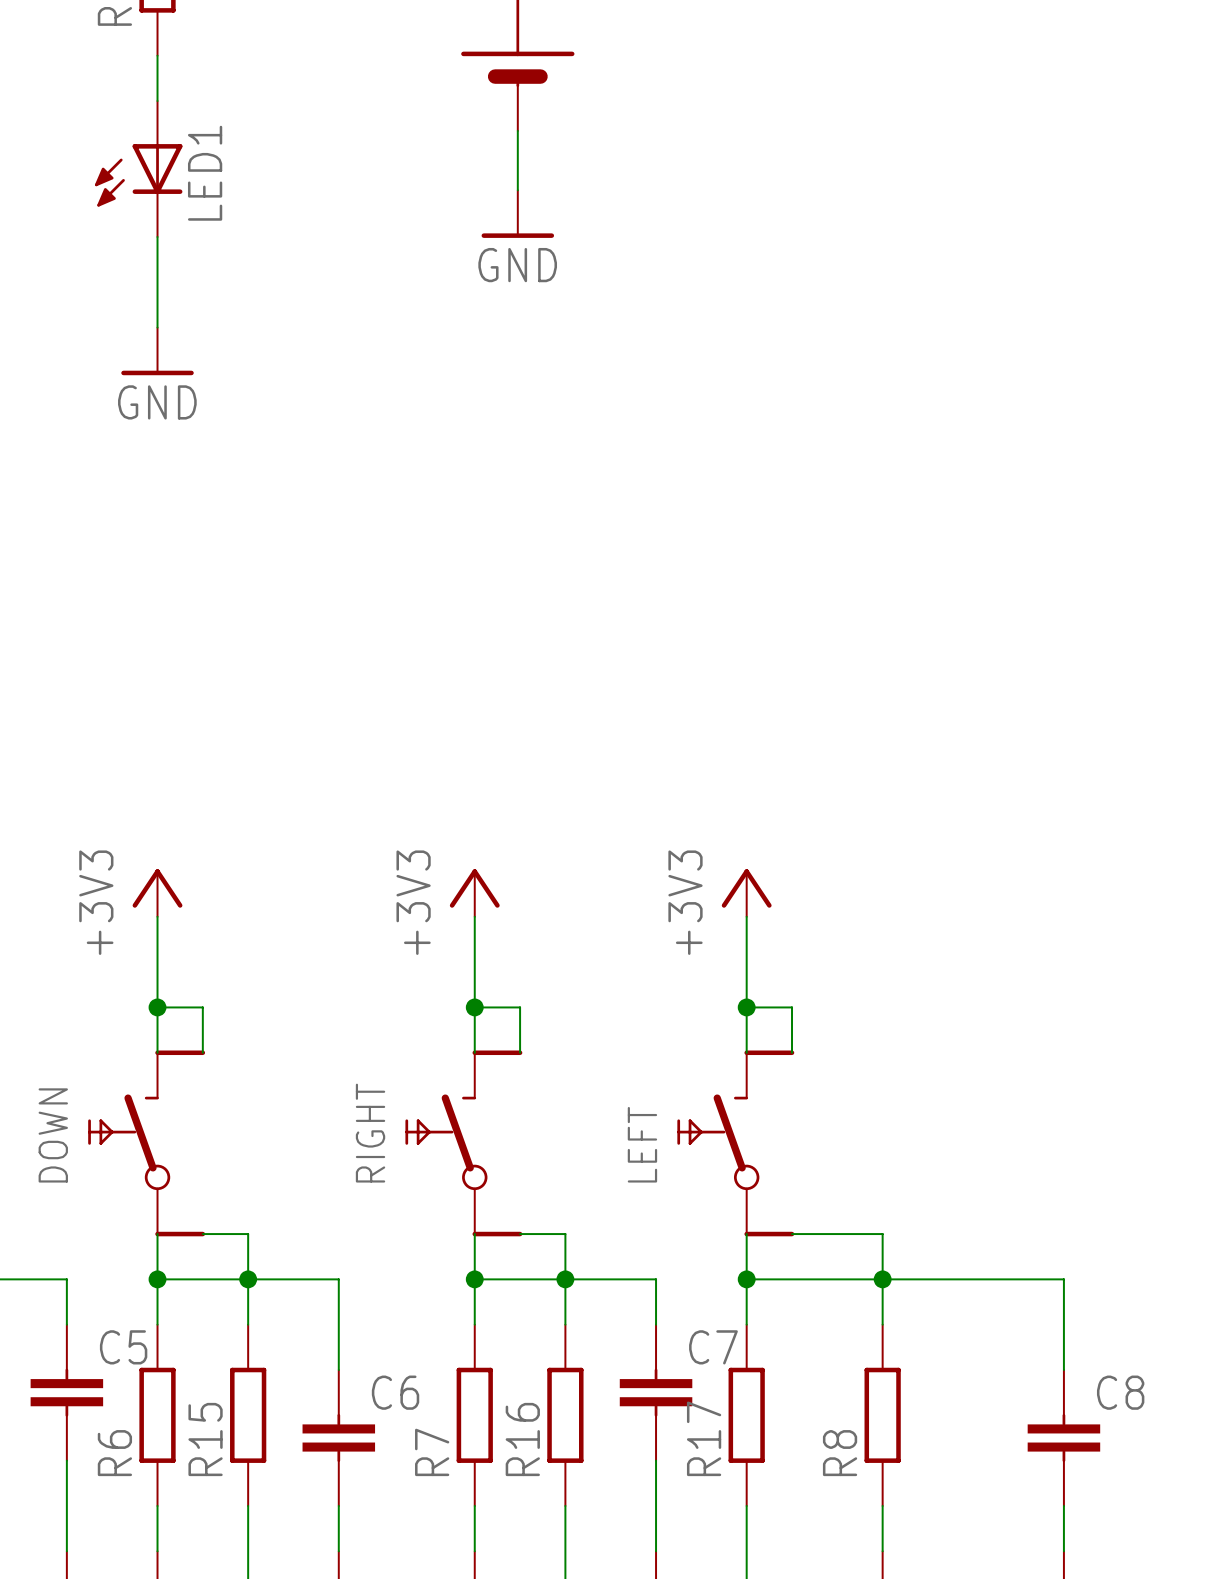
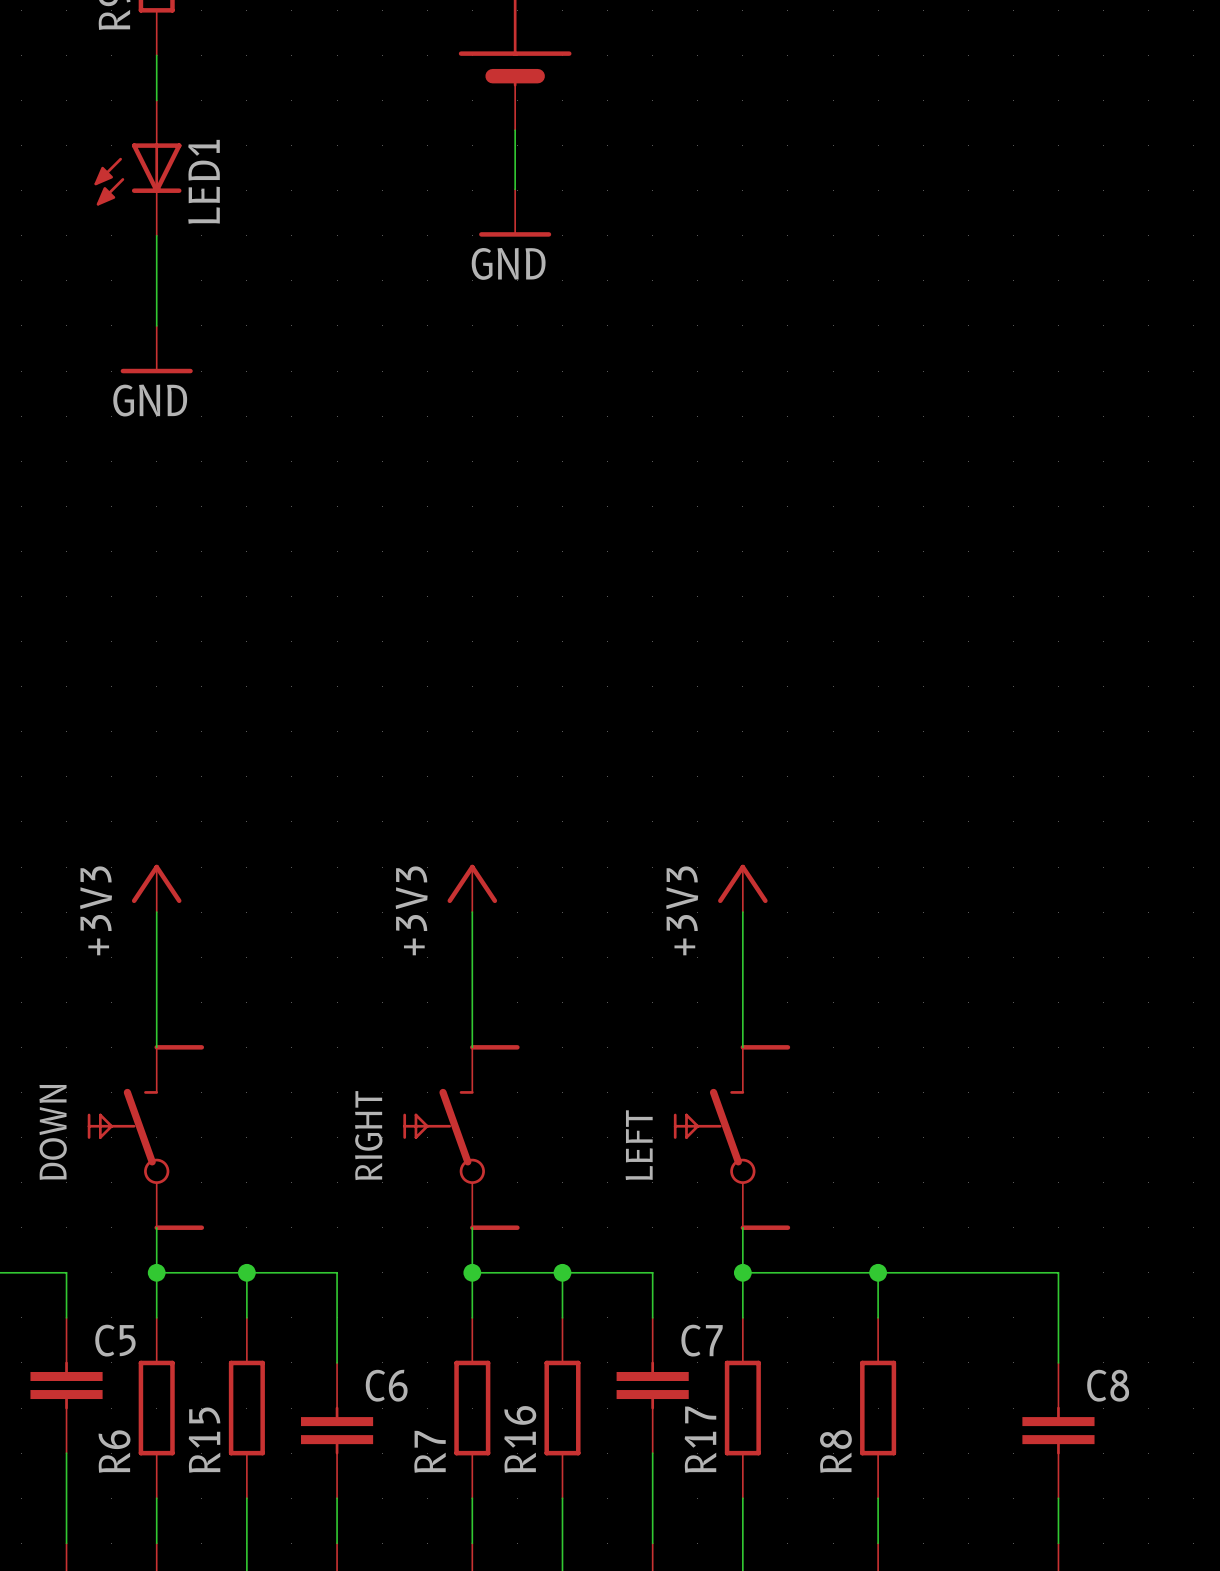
wire: (157, 1007) (202, 1007) (202, 1052) -> none
junction: (157, 1007) -> none
wire: (474, 1007) (520, 1007) (520, 1052) -> none
junction: (474, 1007) -> none
wire: (746, 1007) (792, 1007) (792, 1052) -> none
junction: (746, 1007) -> none
wire: (202, 1234) (248, 1234) (248, 1279) -> none
wire: (520, 1234) (565, 1234) (565, 1279) -> none
wire: (792, 1234) (882, 1234) (882, 1279) -> none

